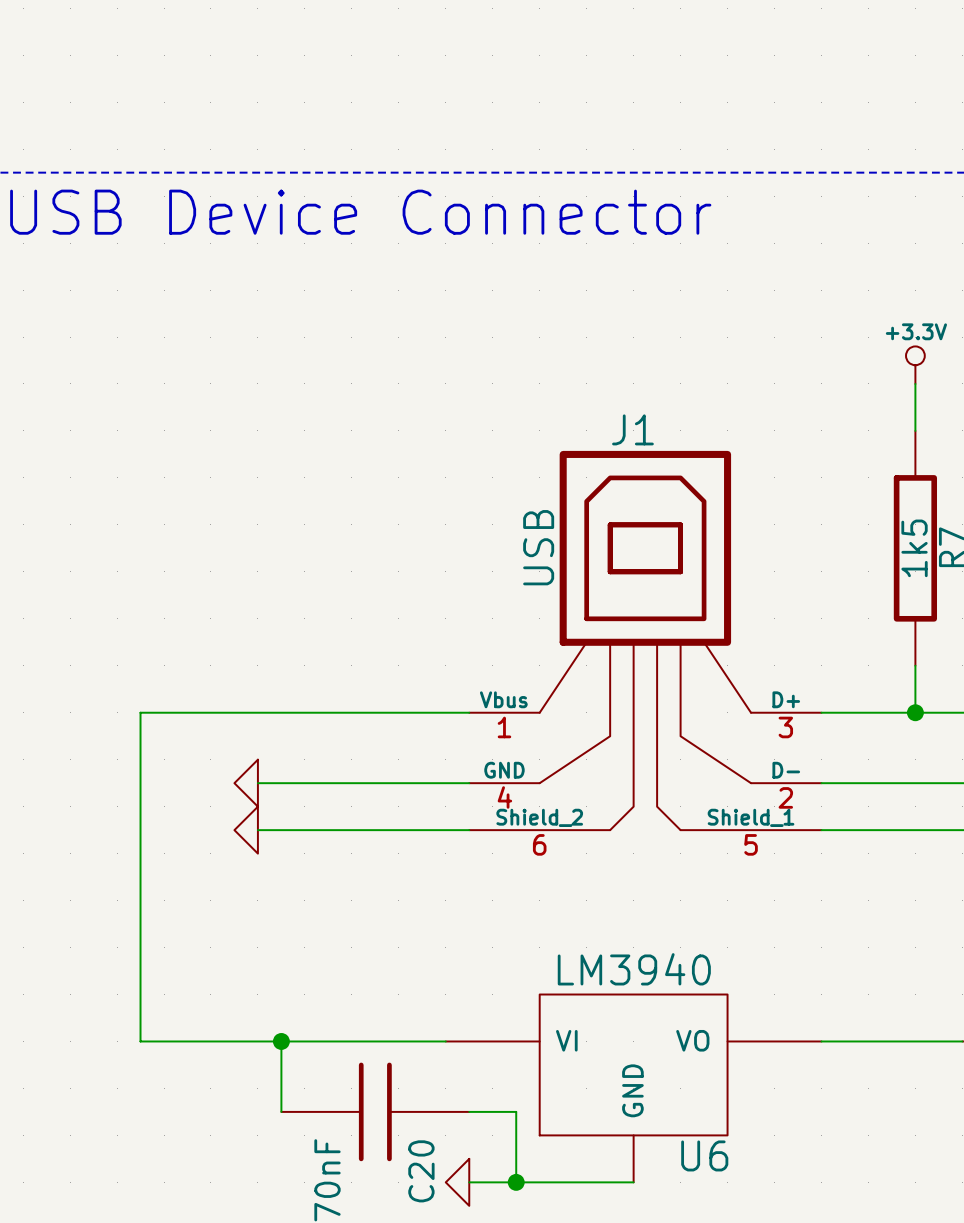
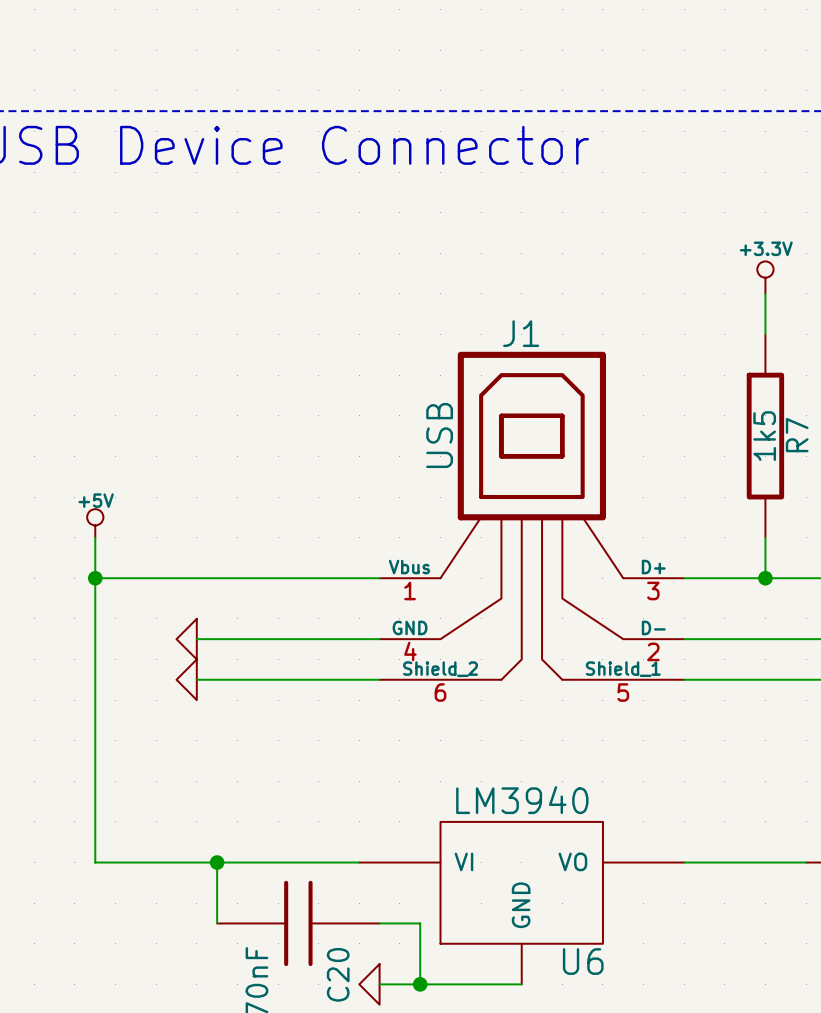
power symbol: none -> +5V (95, 523)
wire: none -> (95, 537) (95, 578)
junction: none -> (95, 578)

